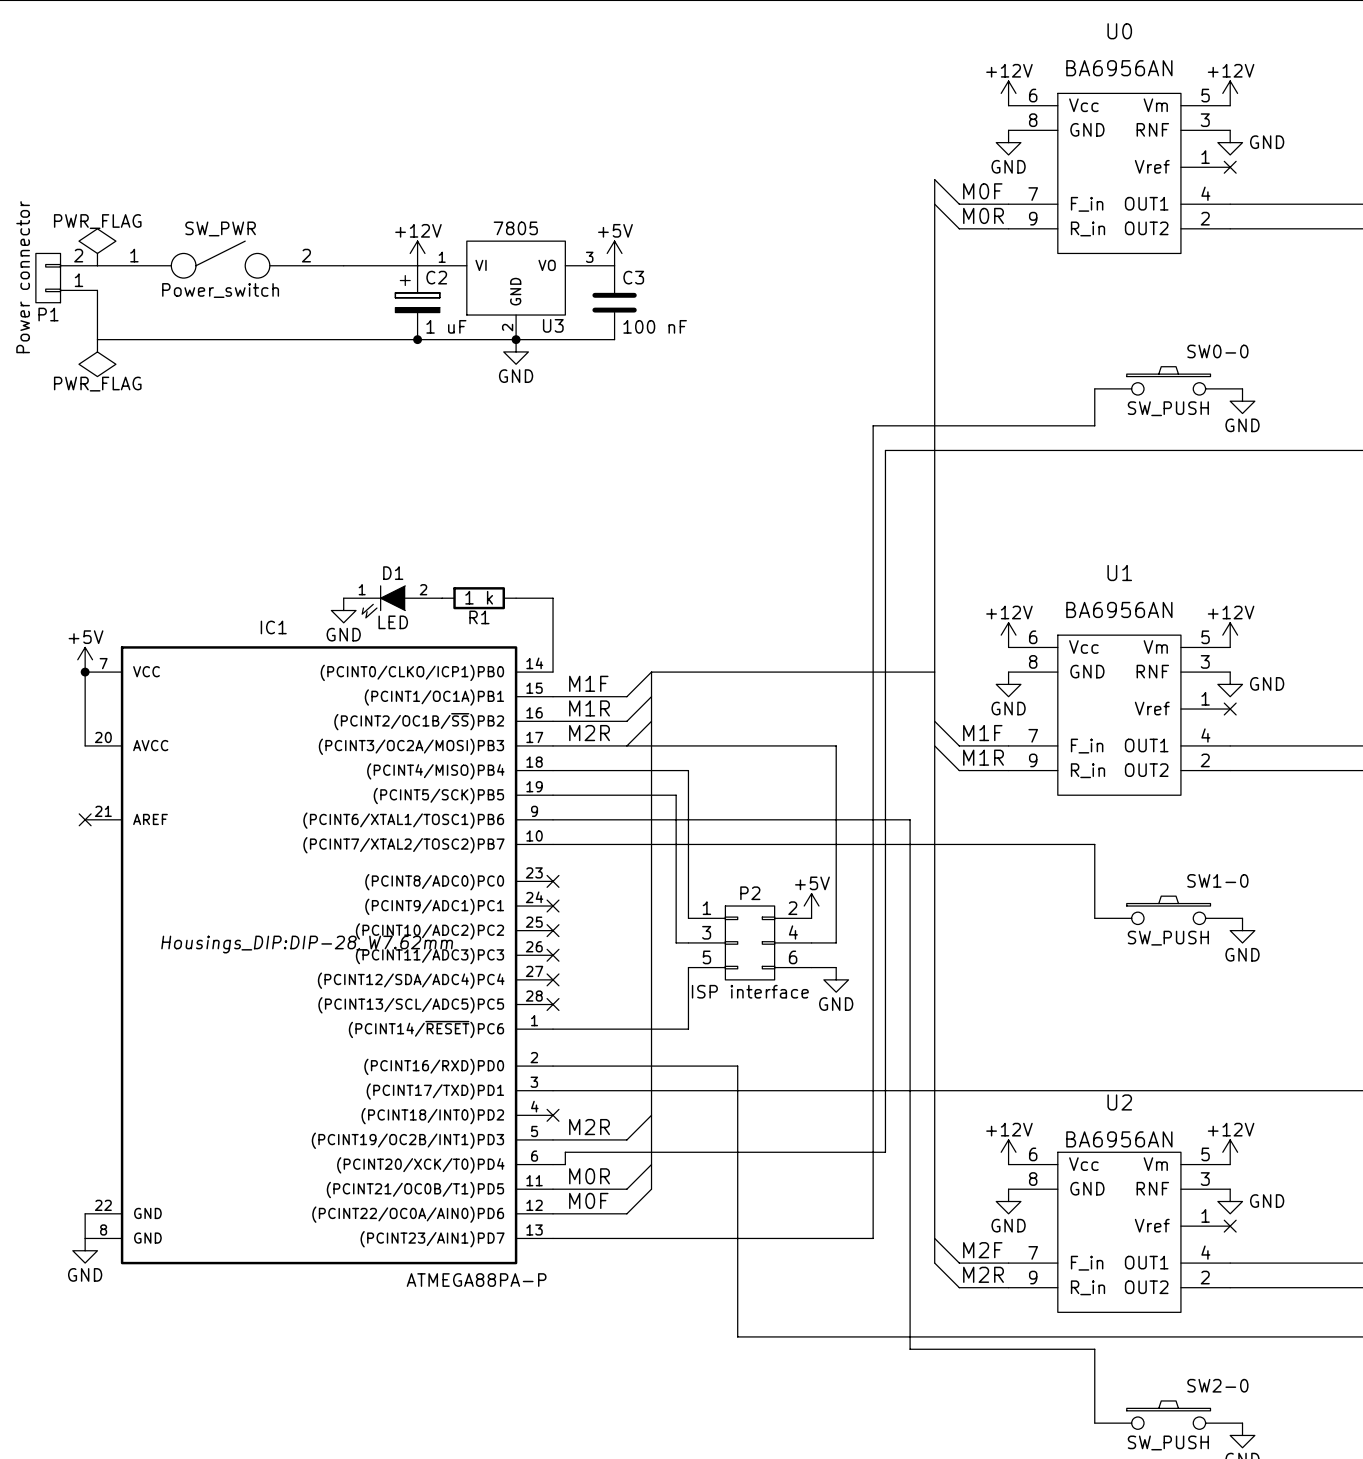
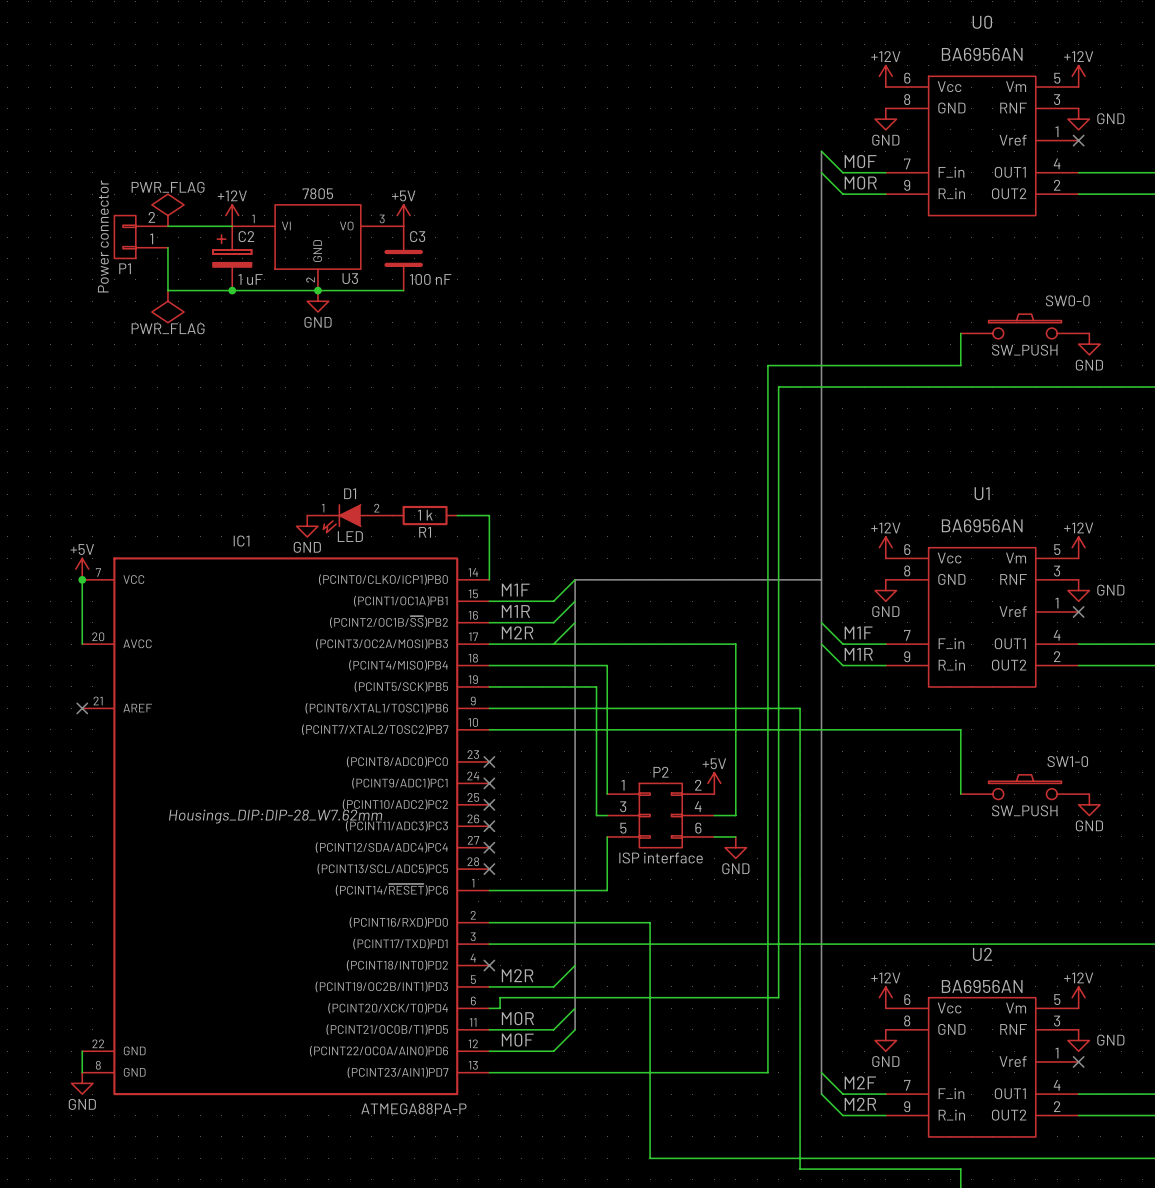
power symbol: PWR_FLAG (97, 247) -> none
power symbol: none -> PWR_FLAG (167, 210)
power symbol position: +12V (417, 253) -> +12V (232, 215)
power symbol position: +5V (614, 253) -> +5V (403, 215)
SW_PWR: Power_switch (220, 259) -> none
wire: (343, 265) (417, 265) -> (167, 226) (232, 226)
P1 position: (66, 278) -> (141, 237)
wire: (97, 290) (97, 339) (183, 339) -> (167, 247) (167, 290)
U3 position: (516, 290) -> (317, 247)
C2 position: (417, 302) -> (232, 258)
C3 position: (614, 302) -> (403, 258)
junction: none -> (232, 290)
junction: none -> (317, 290)
junction: (417, 339) -> none
wire: (454, 339) (614, 339) -> none
junction: (516, 339) -> none
power symbol position: GND (516, 351) -> GND (317, 301)
power symbol: PWR_FLAG (97, 358) -> none
power symbol: none -> PWR_FLAG (167, 306)

